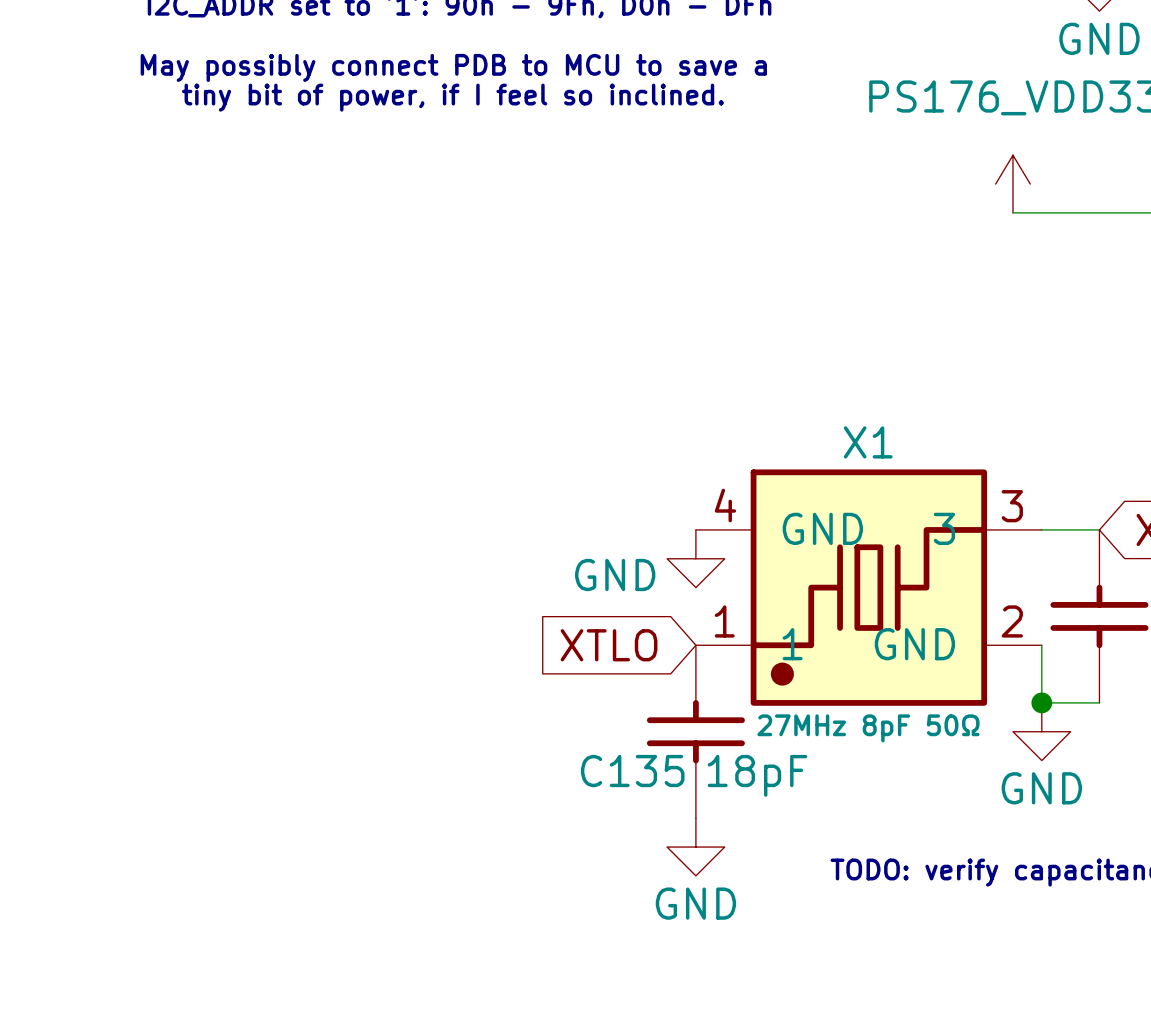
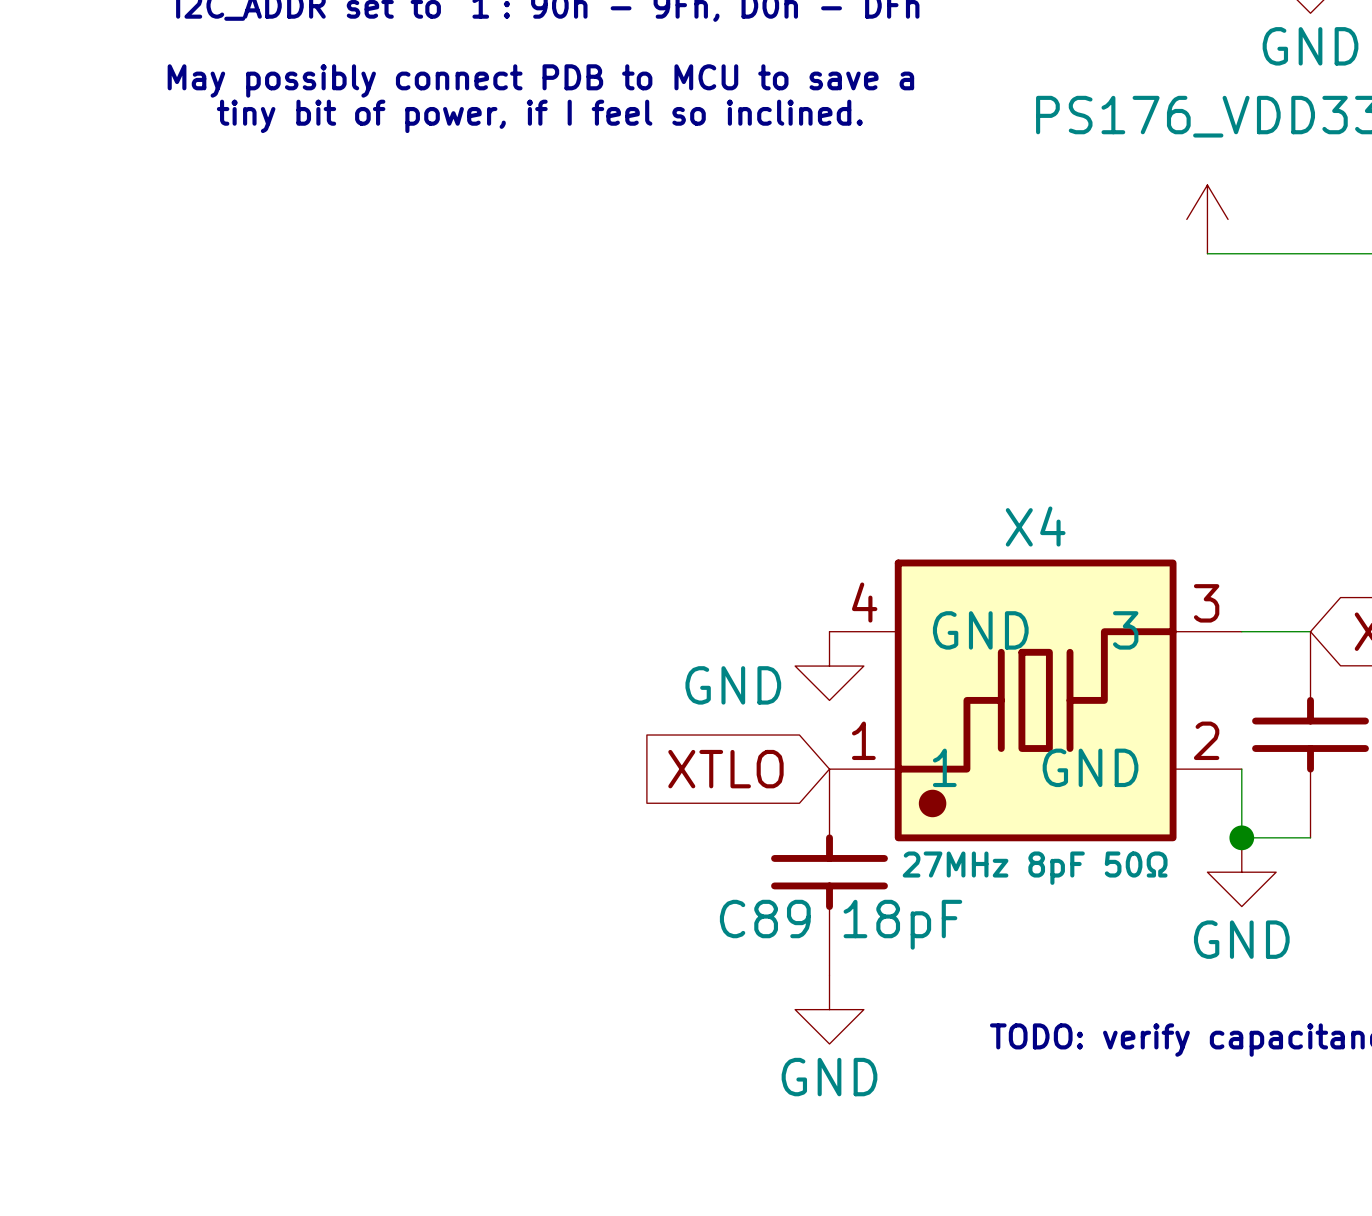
X1 name: X1 (868, 442) -> X4 (1035, 526)
C135 name: C135 (632, 771) -> C89 (765, 919)

